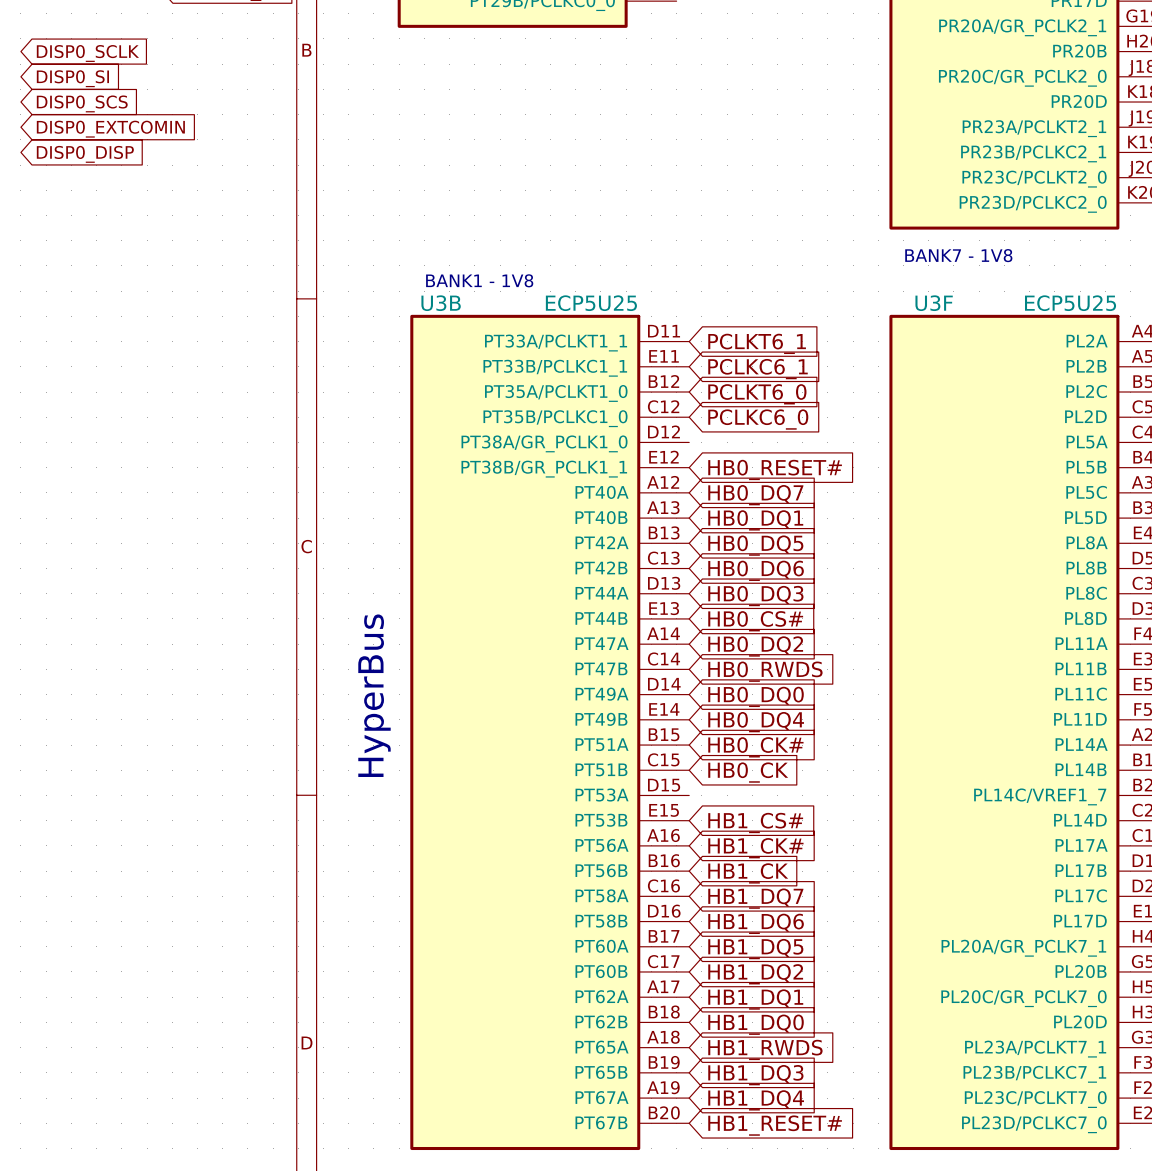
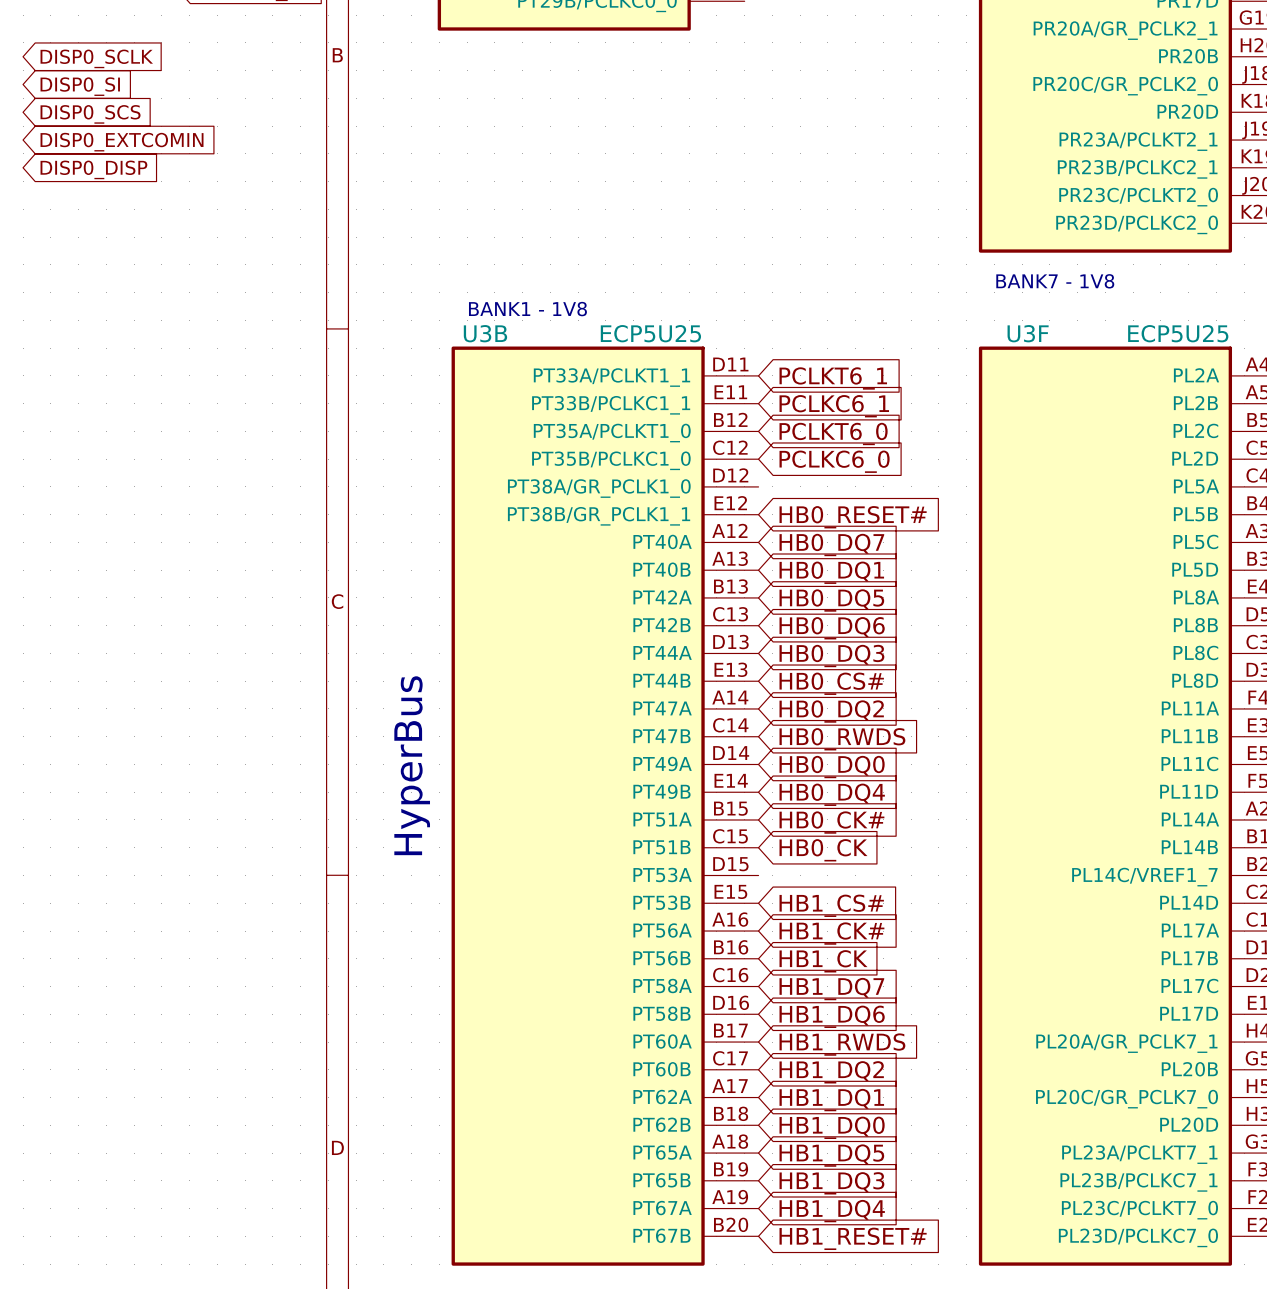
global label: HB1_DQ5 (755, 949) -> HB1_RWDS (842, 1044)
global label: HB1_RWDS (765, 1049) -> HB1_DQ5 (831, 1155)

